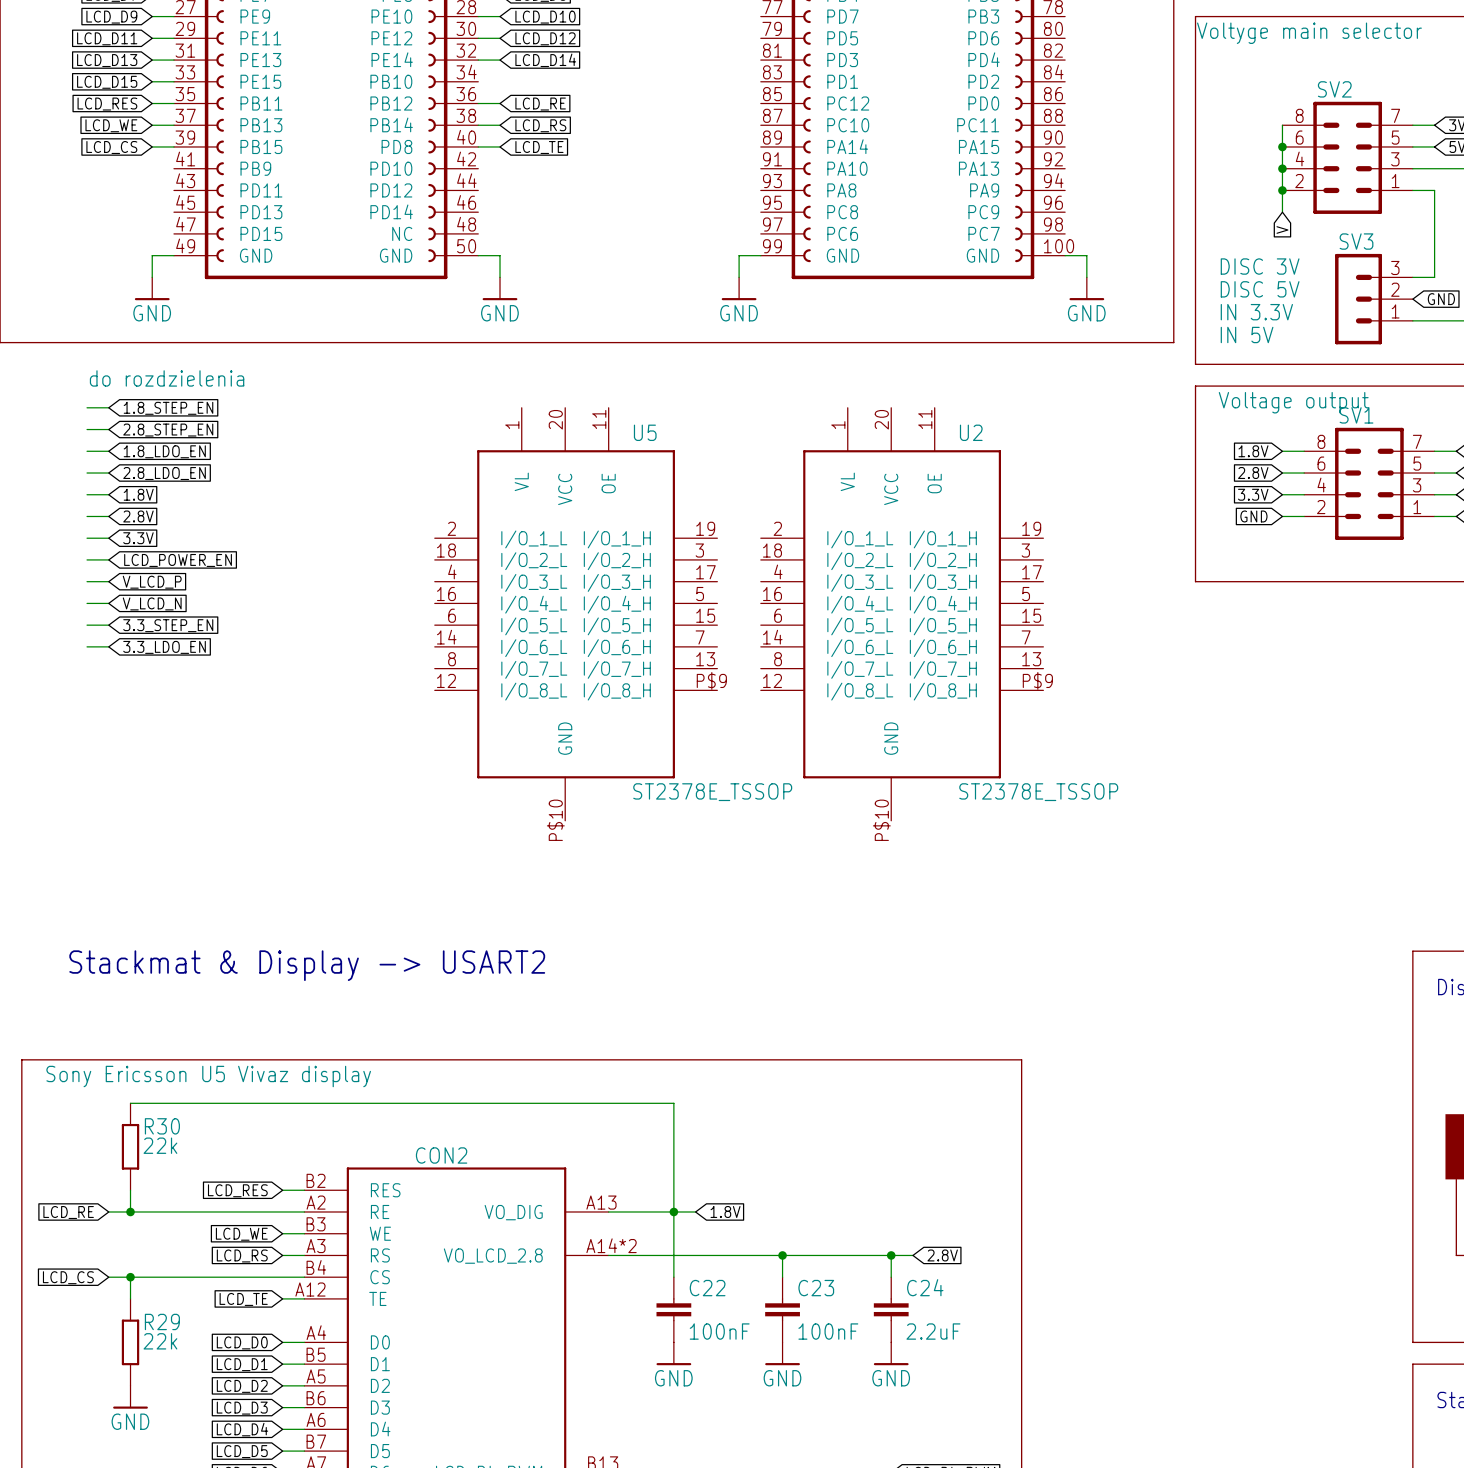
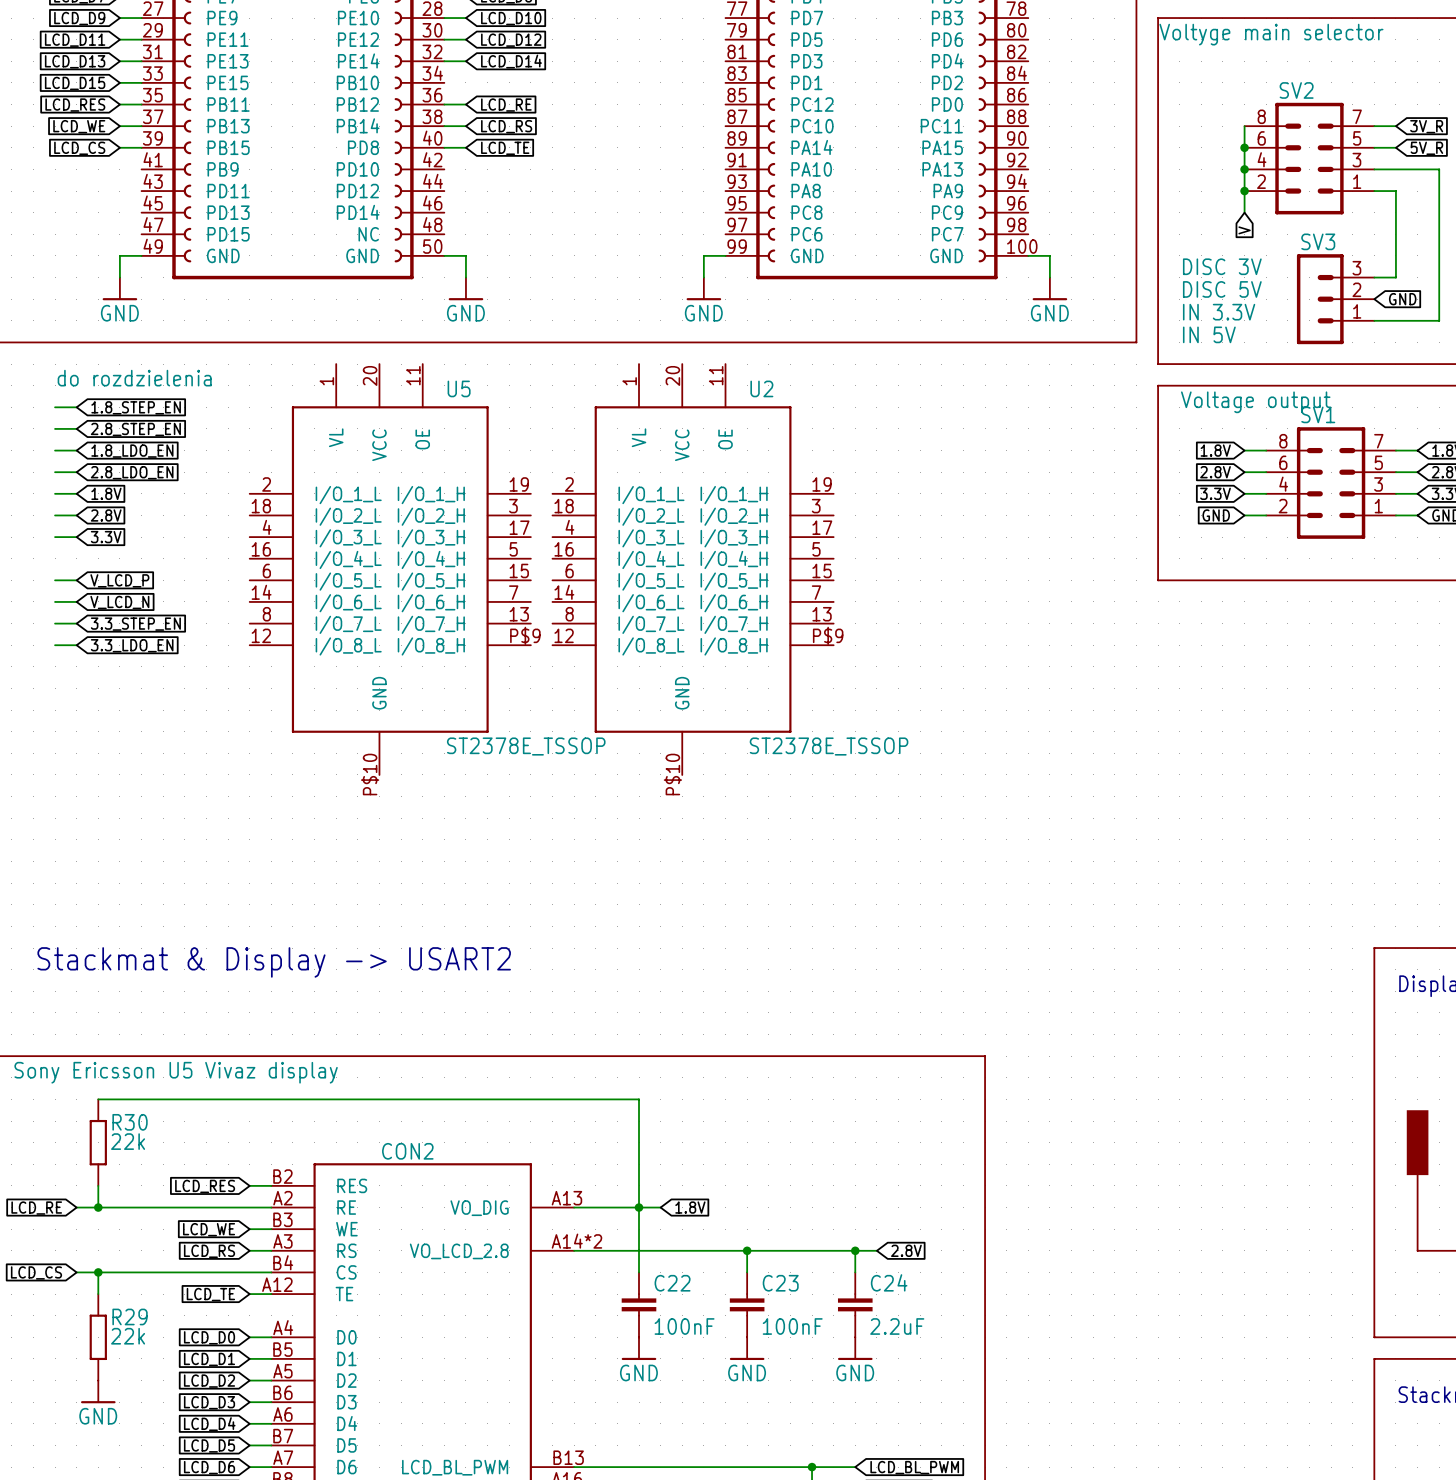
wire: (87, 559) (108, 559) -> none
global label: LCD_POWER_EN (178, 560) -> none
U5 position: (576, 614) -> (390, 569)
U2 position: (902, 614) -> (693, 569)

